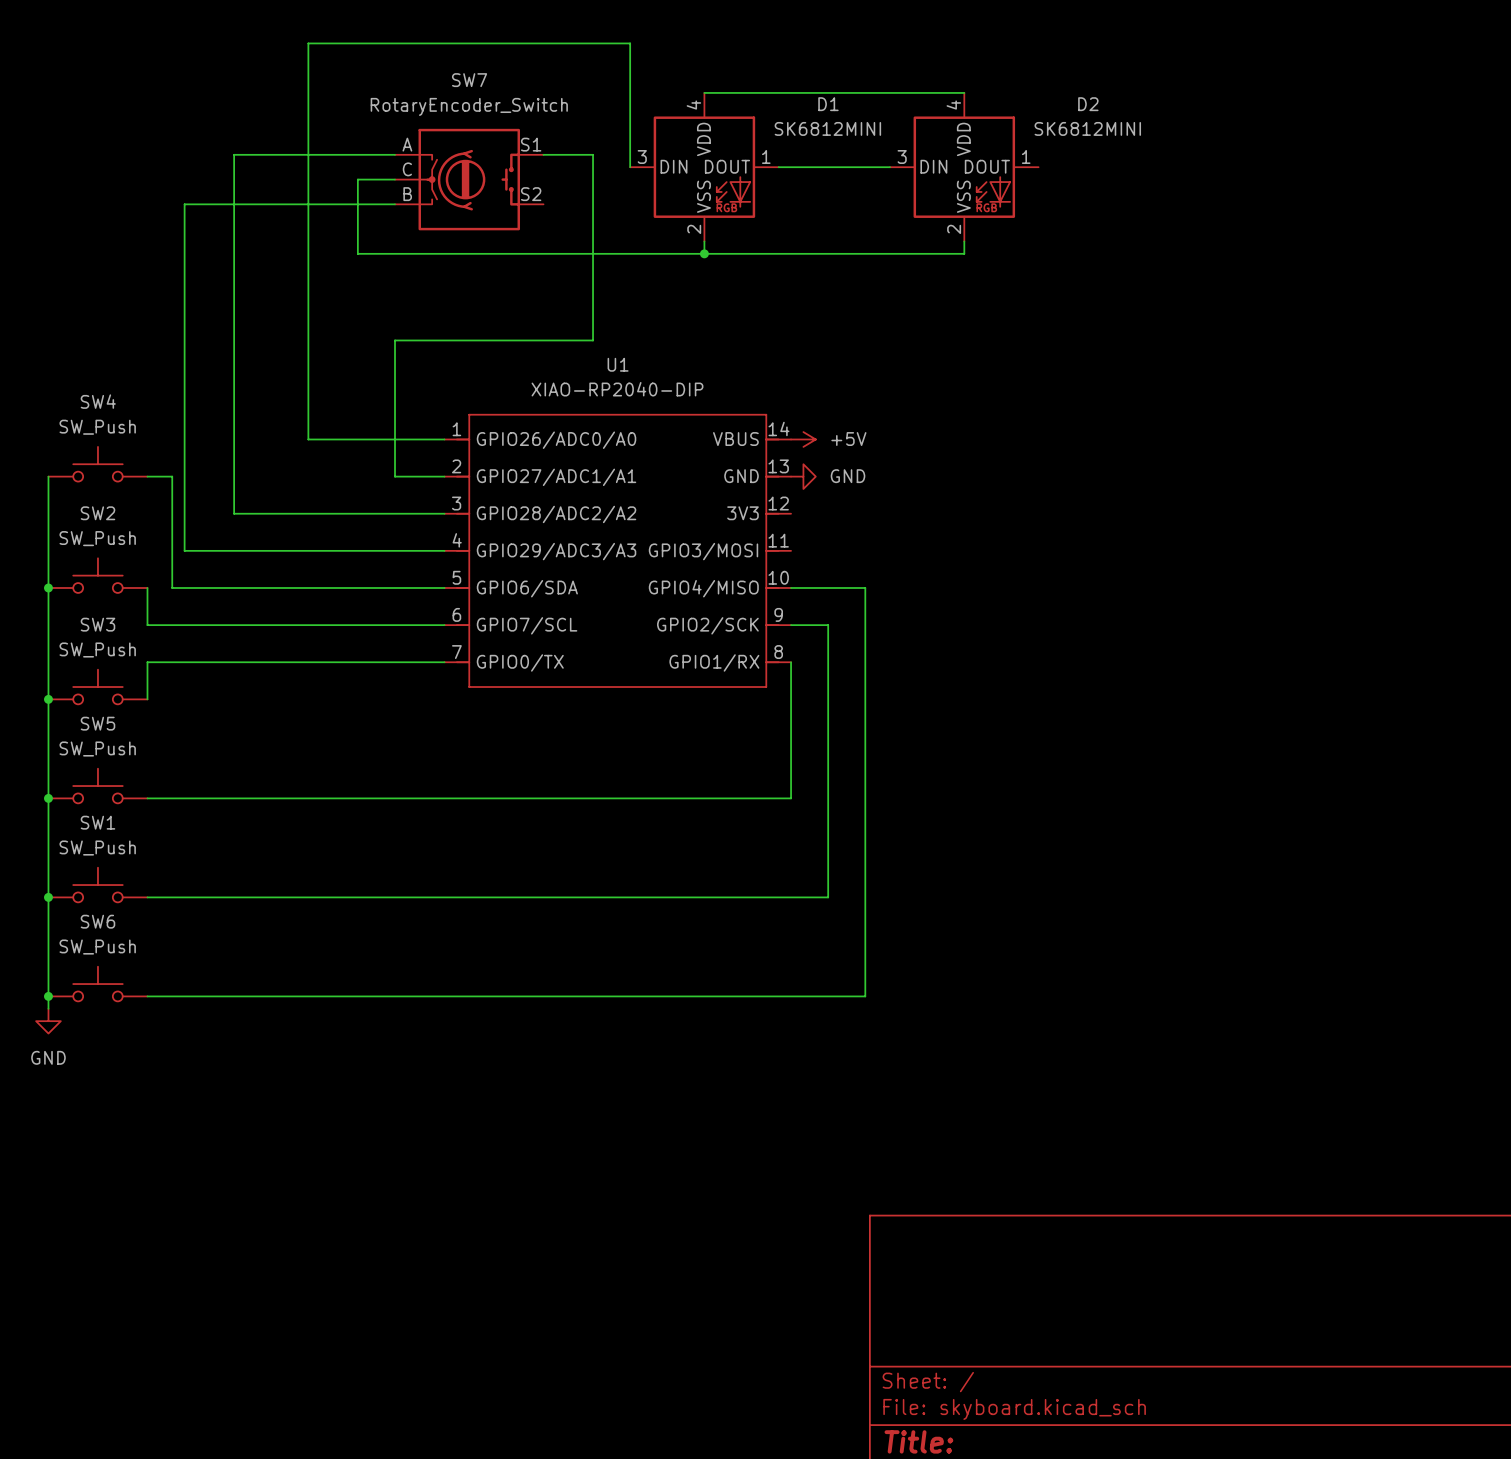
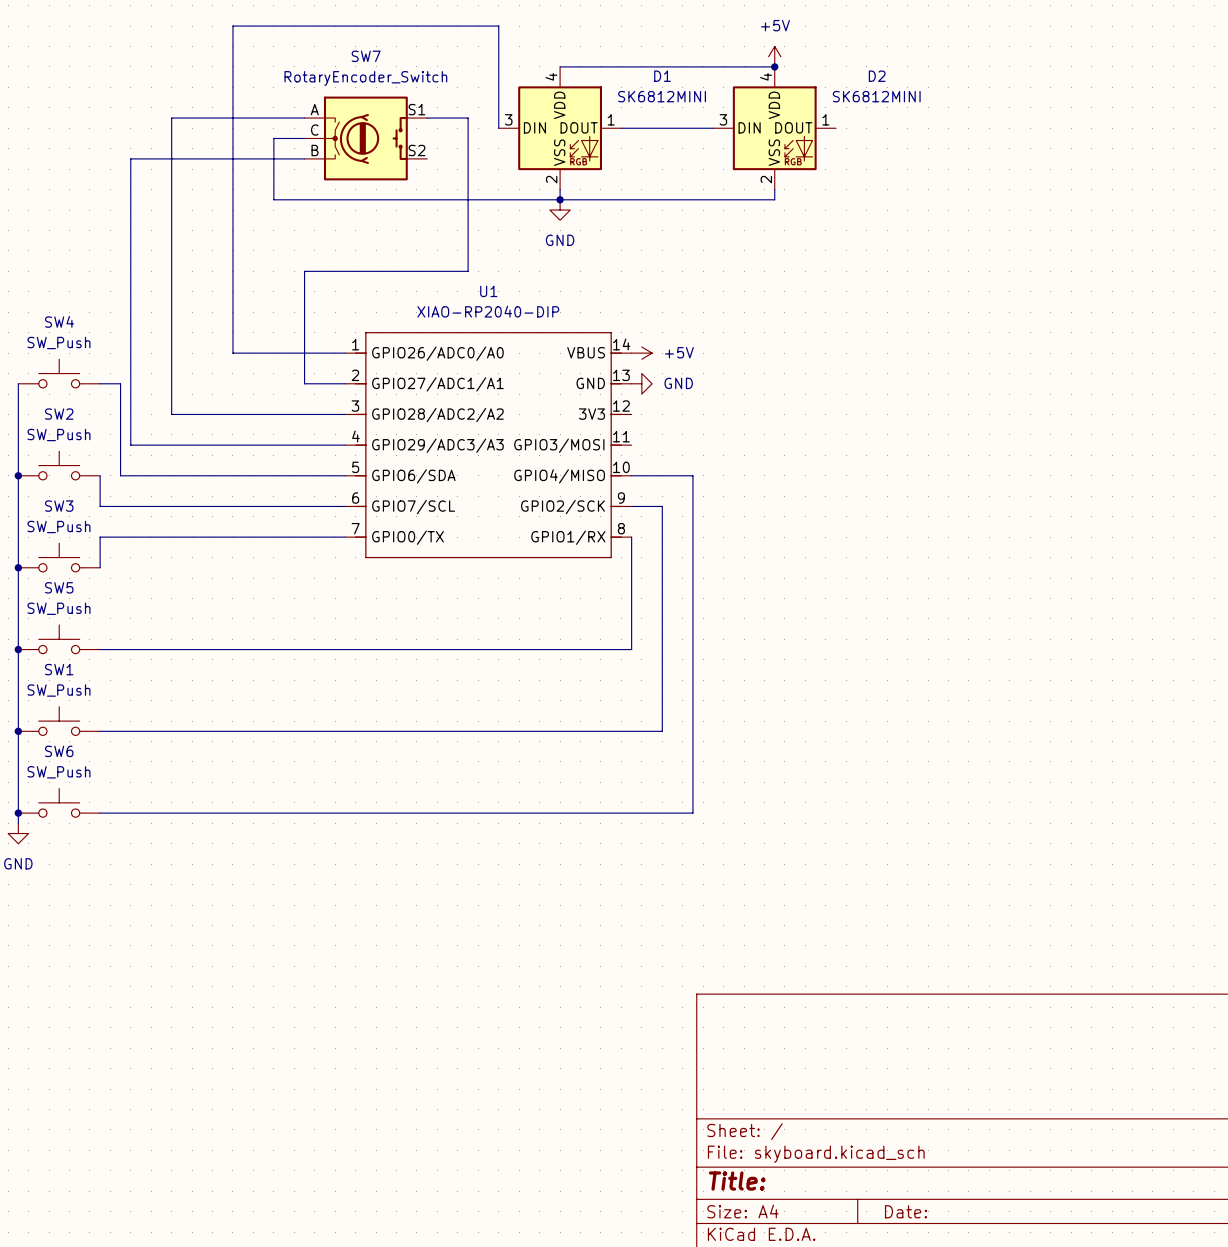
power symbol: none -> +5V (774, 56)
junction: none -> (774, 66)
power symbol: none -> GND (560, 210)

